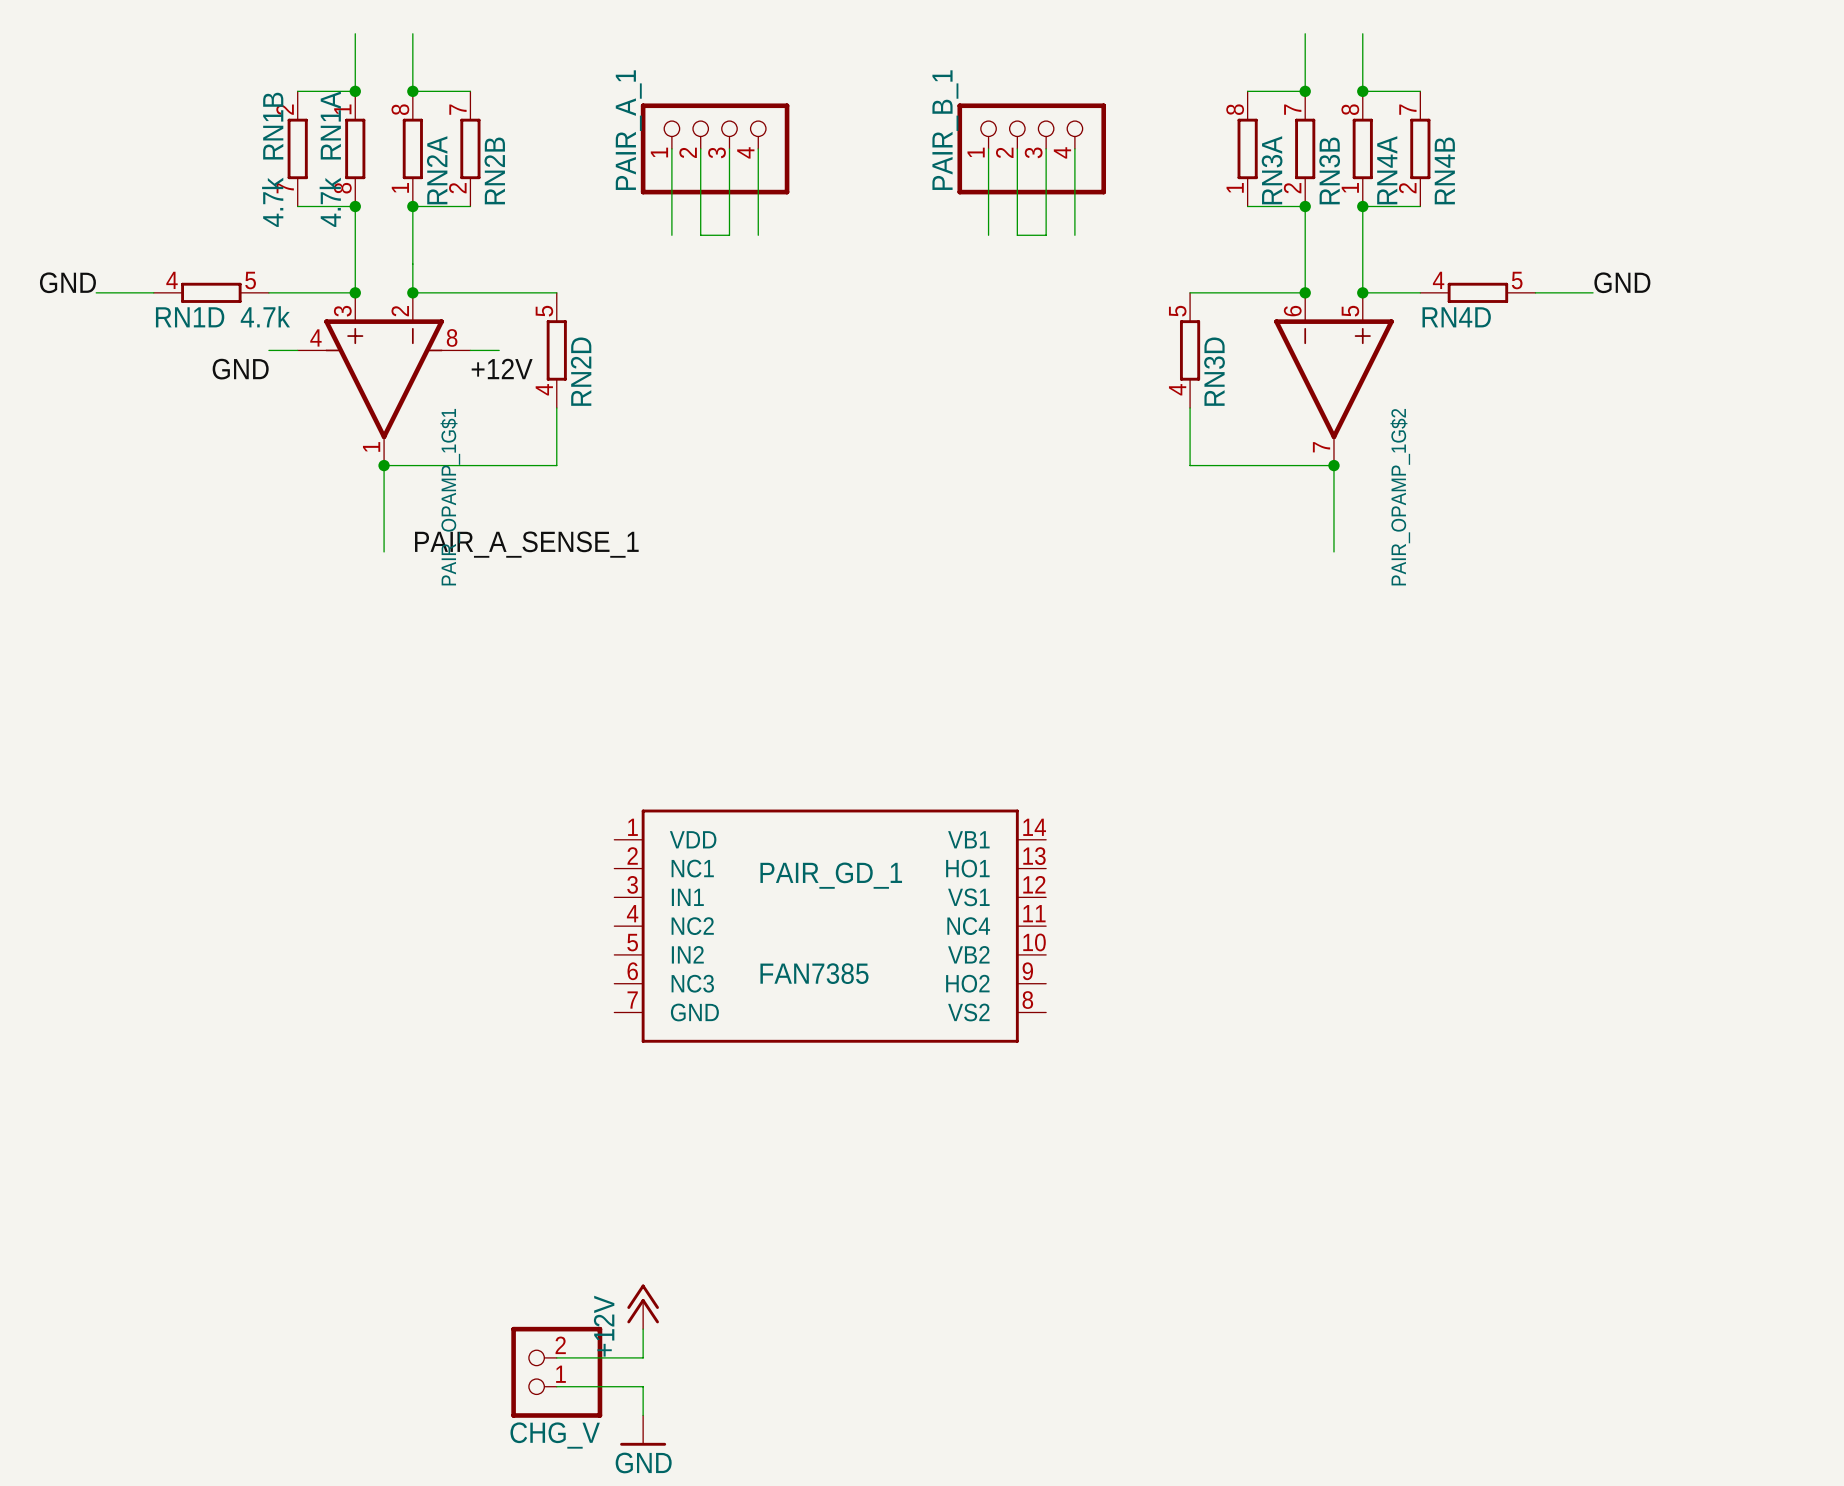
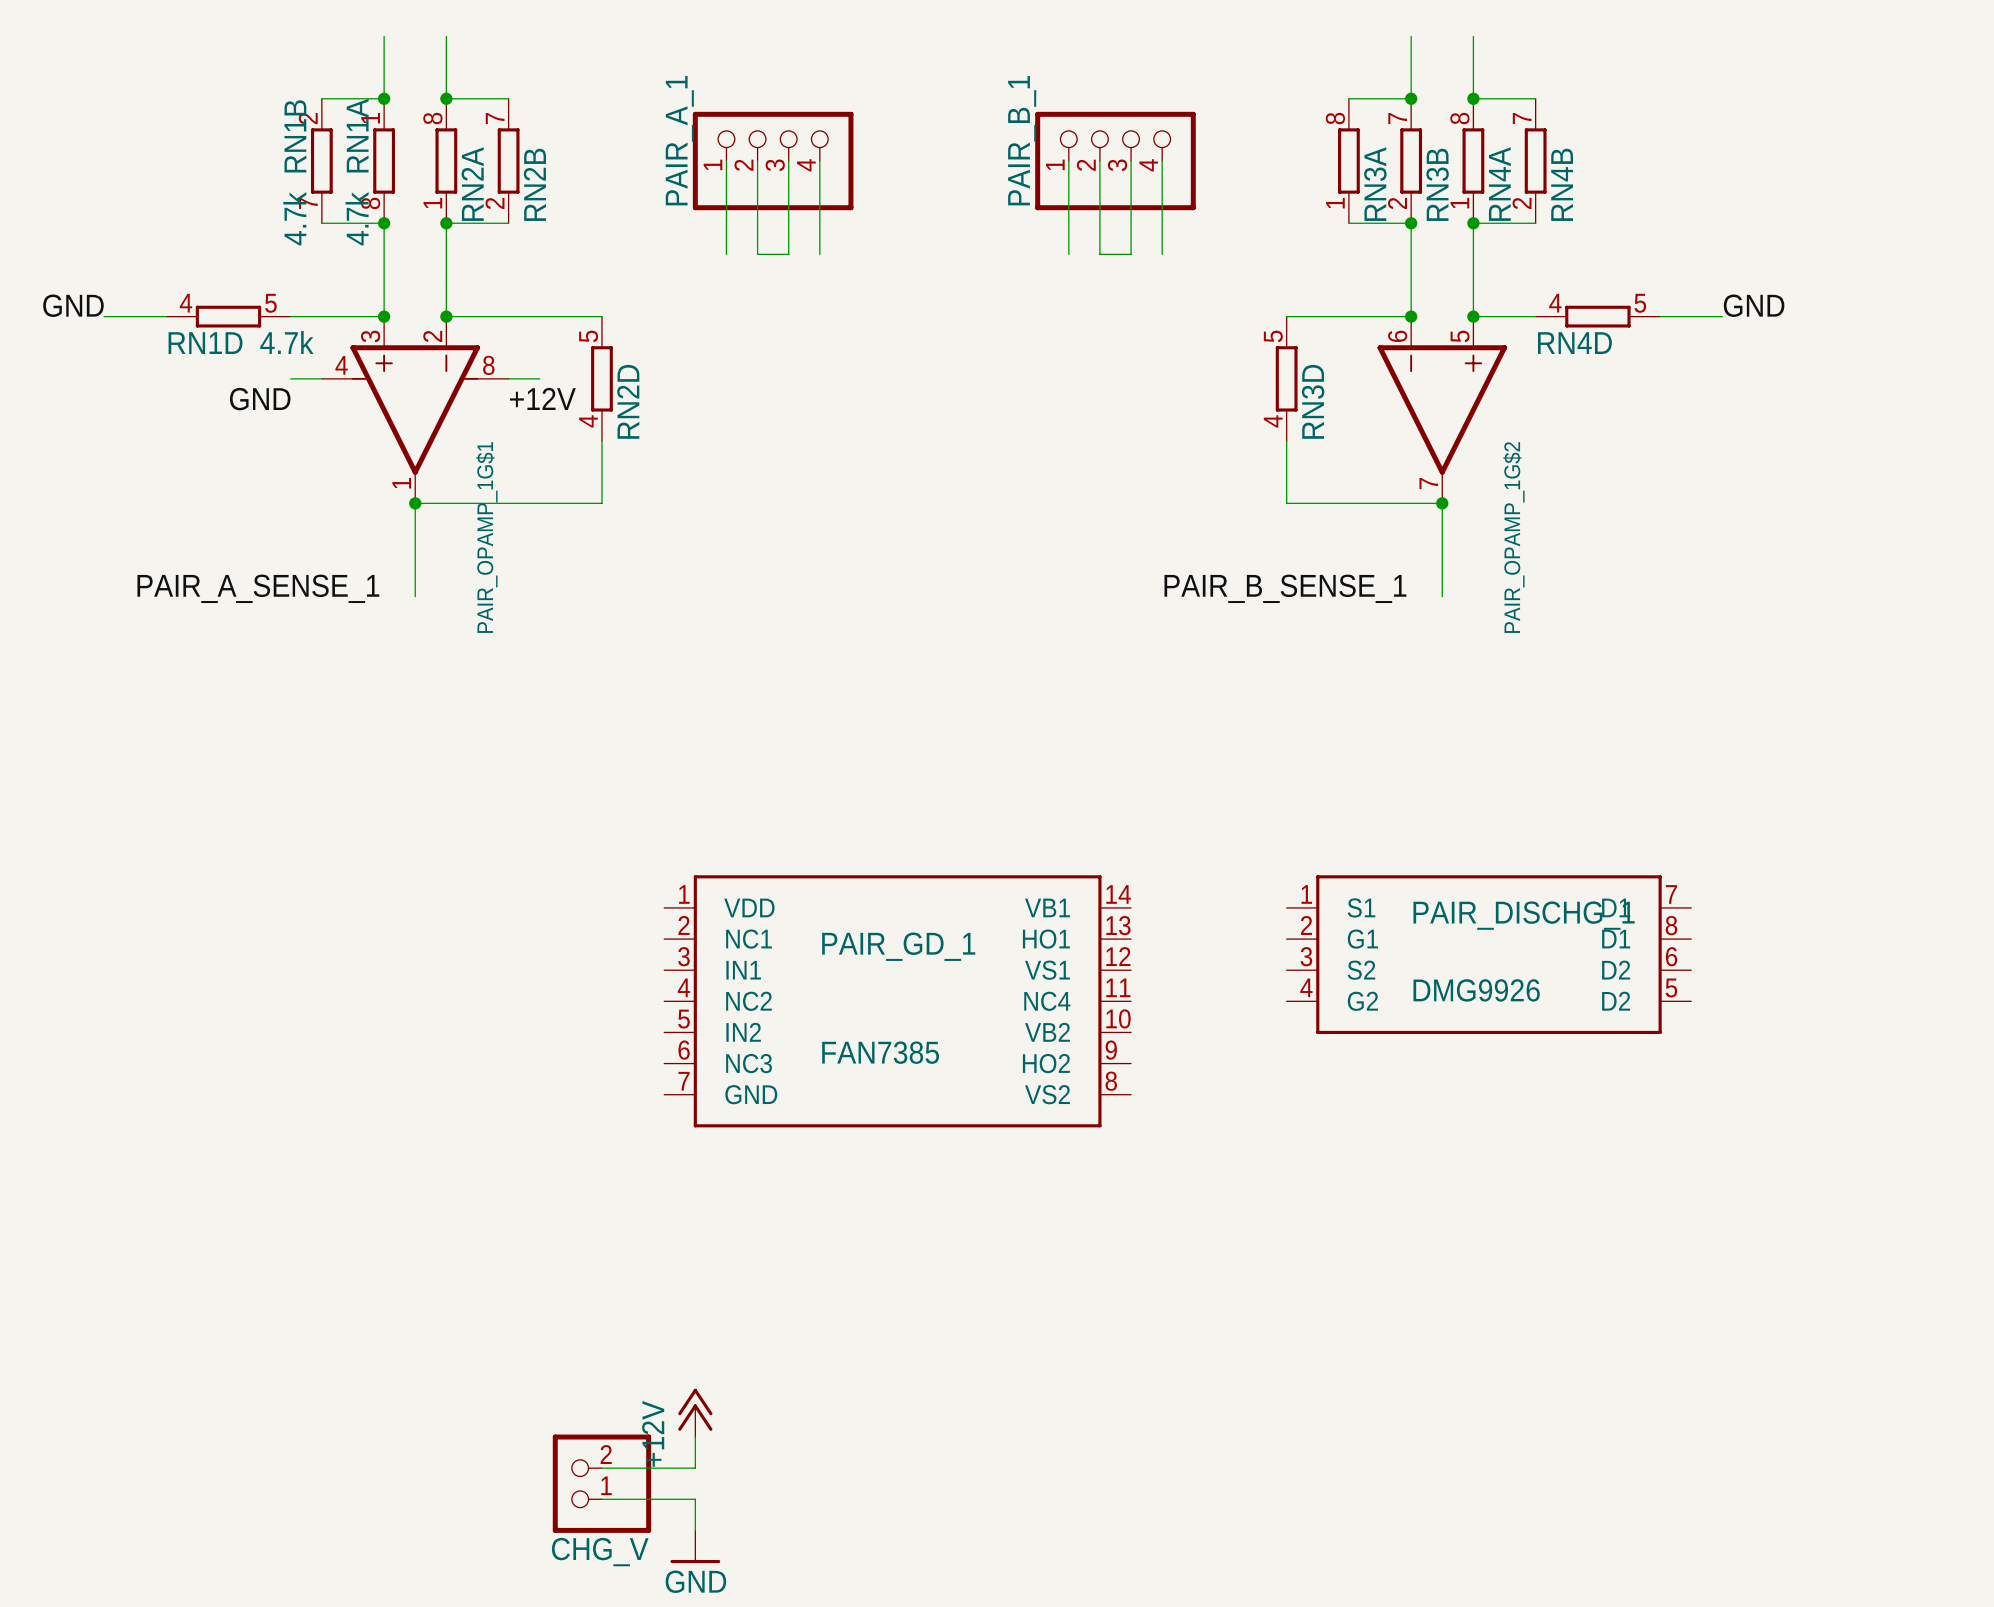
label: none -> PAIR_A_SENSE_1 (258, 588)
label: PAIR_A_SENSE_1 (526, 544) -> none
label: none -> PAIR_B_SENSE_1 (1285, 588)
PAIR_DISCHG_1: none -> (1488, 954)

